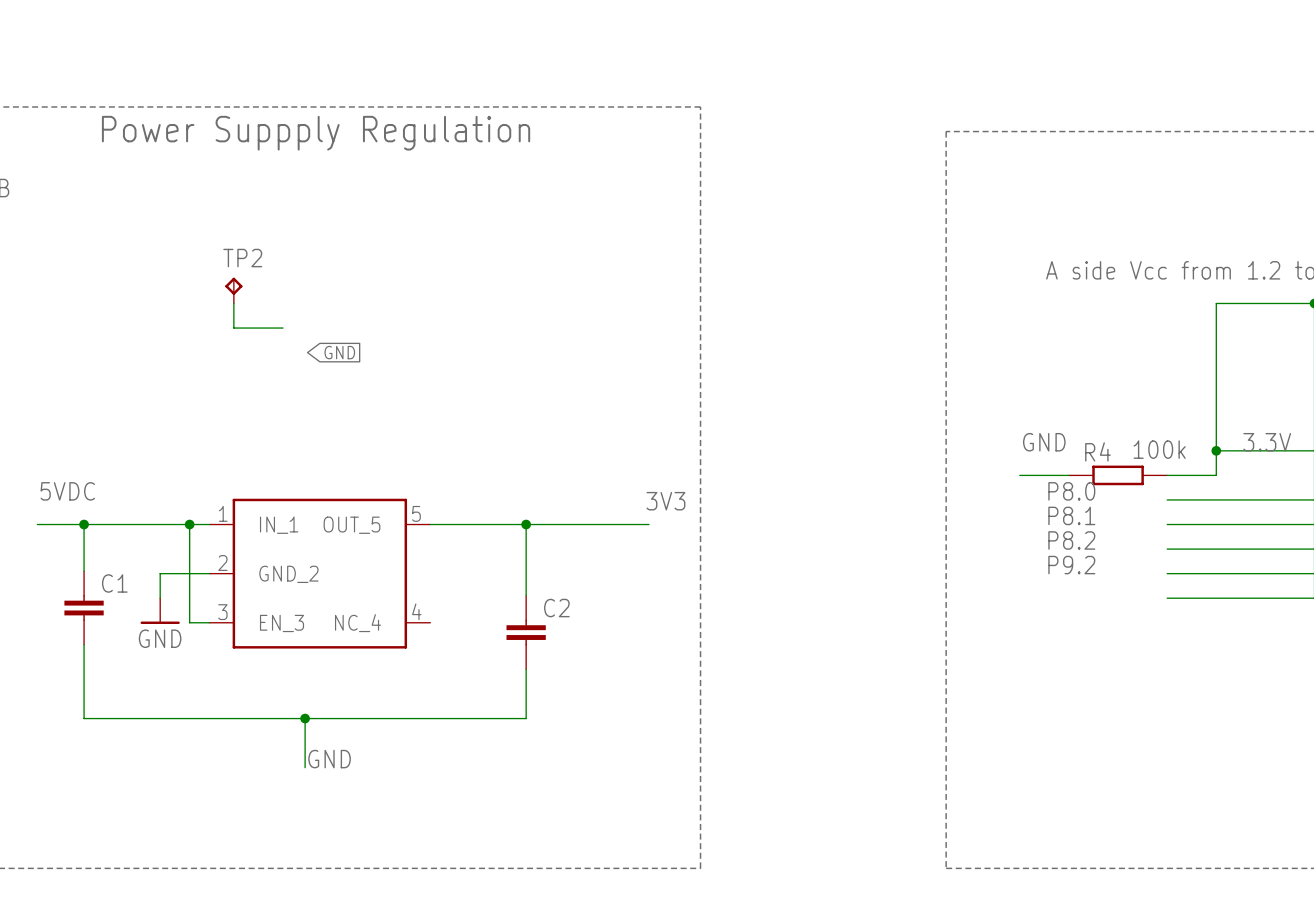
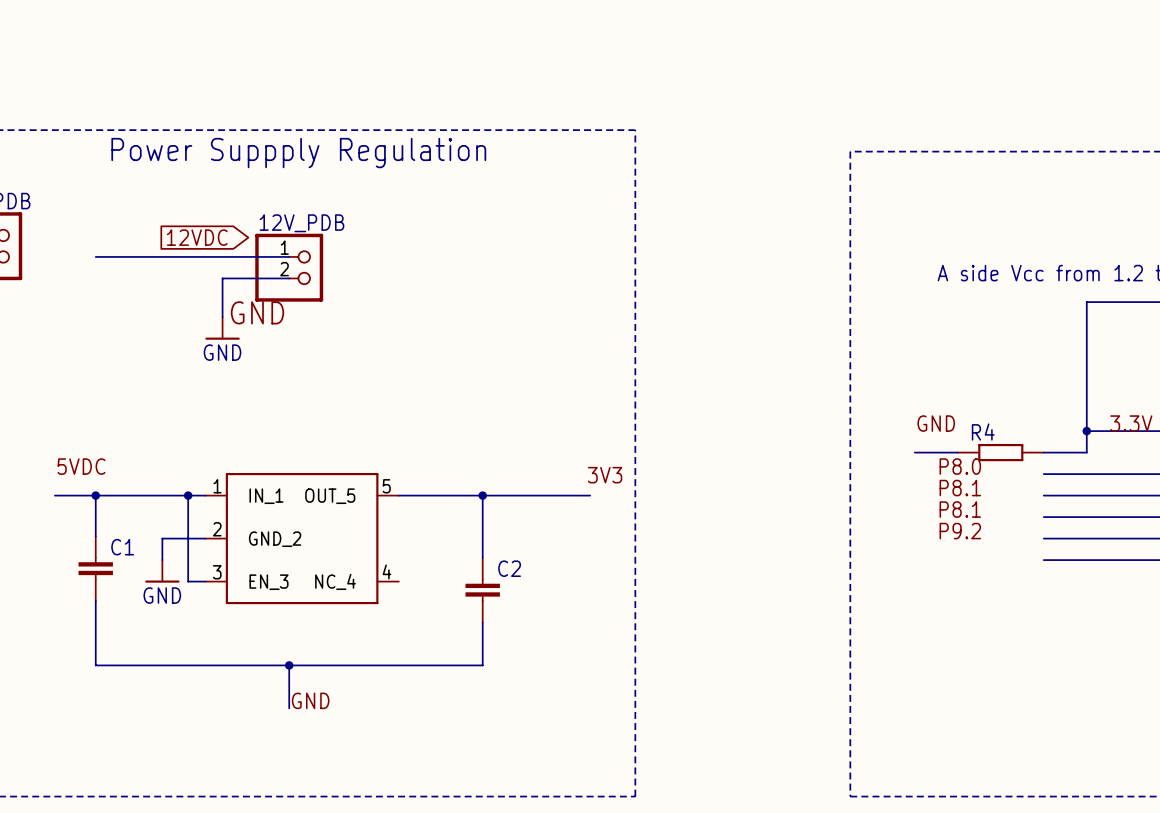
global label: none -> 12VDC (197, 237)
wire: none -> (95, 256) (289, 256)
12V_PDB: none -> (289, 267)
wire: none -> (289, 278) (222, 278) (222, 317)
TP2: (233, 290) -> none
wire: (233, 303) (233, 328) (282, 328) -> none
label: none -> GND (257, 312)
power symbol: none -> GND (222, 328)
global label: GND (339, 352) -> none
R4 value: 100k (1159, 449) -> none
label: P8.2 (1071, 540) -> P8.1 (960, 509)

